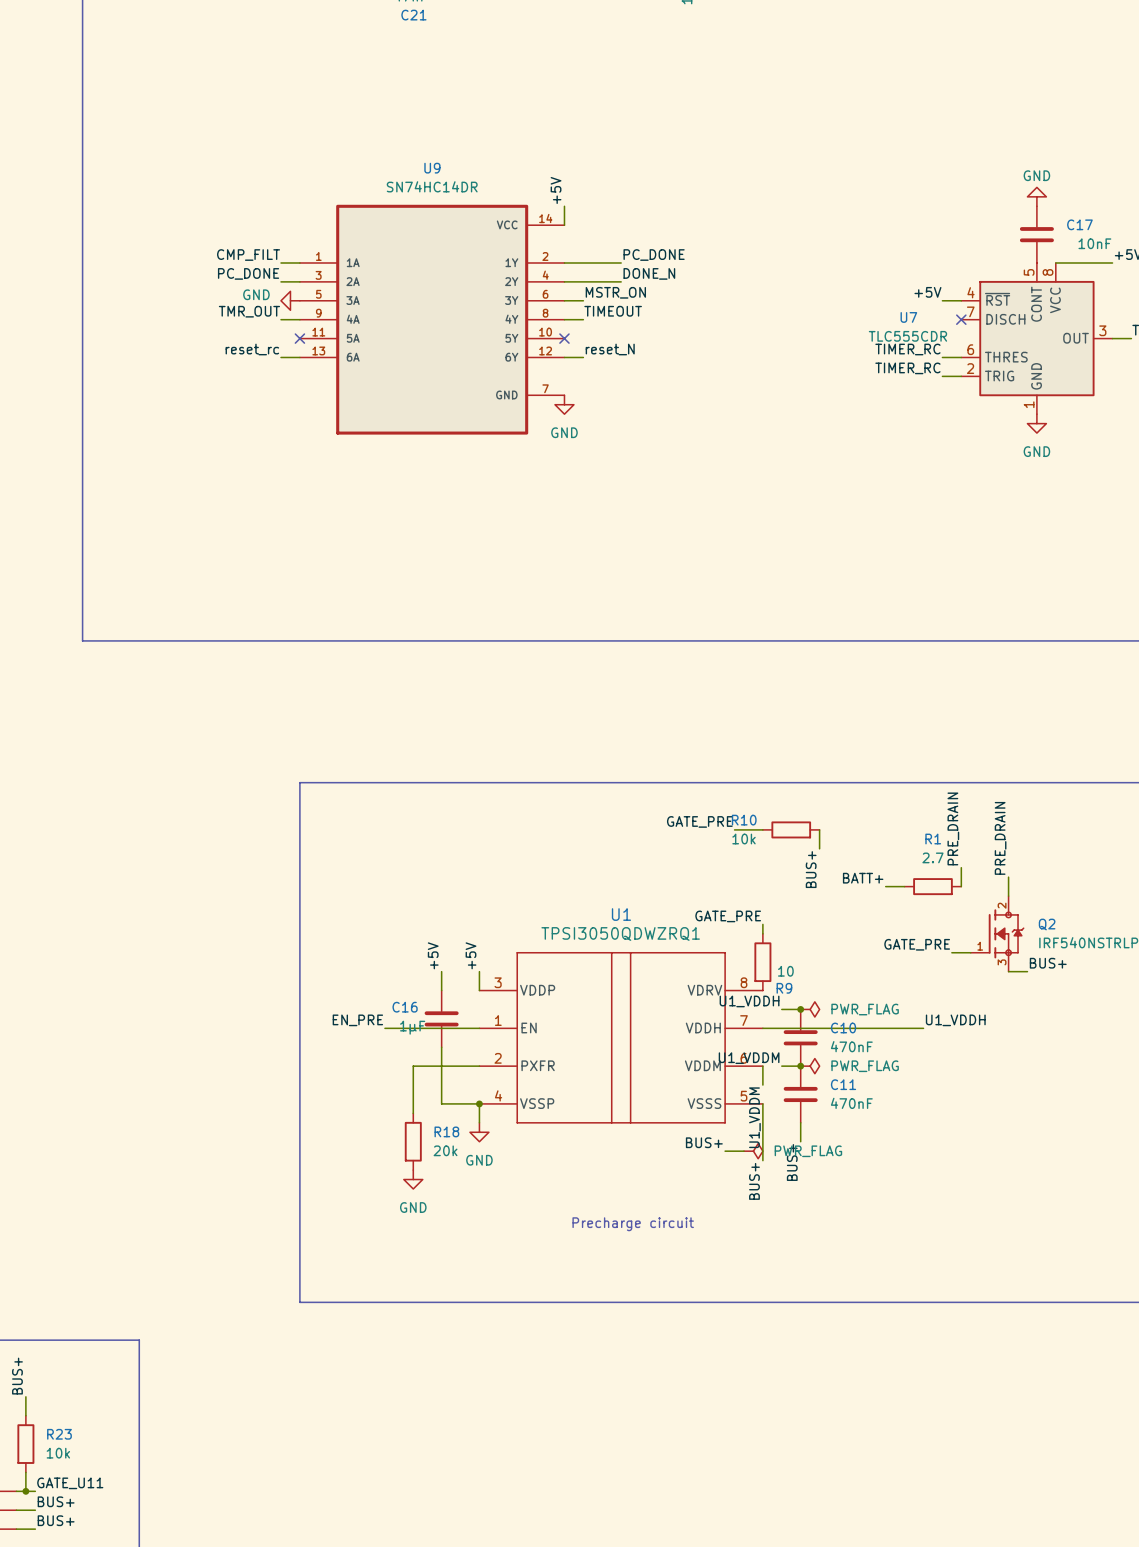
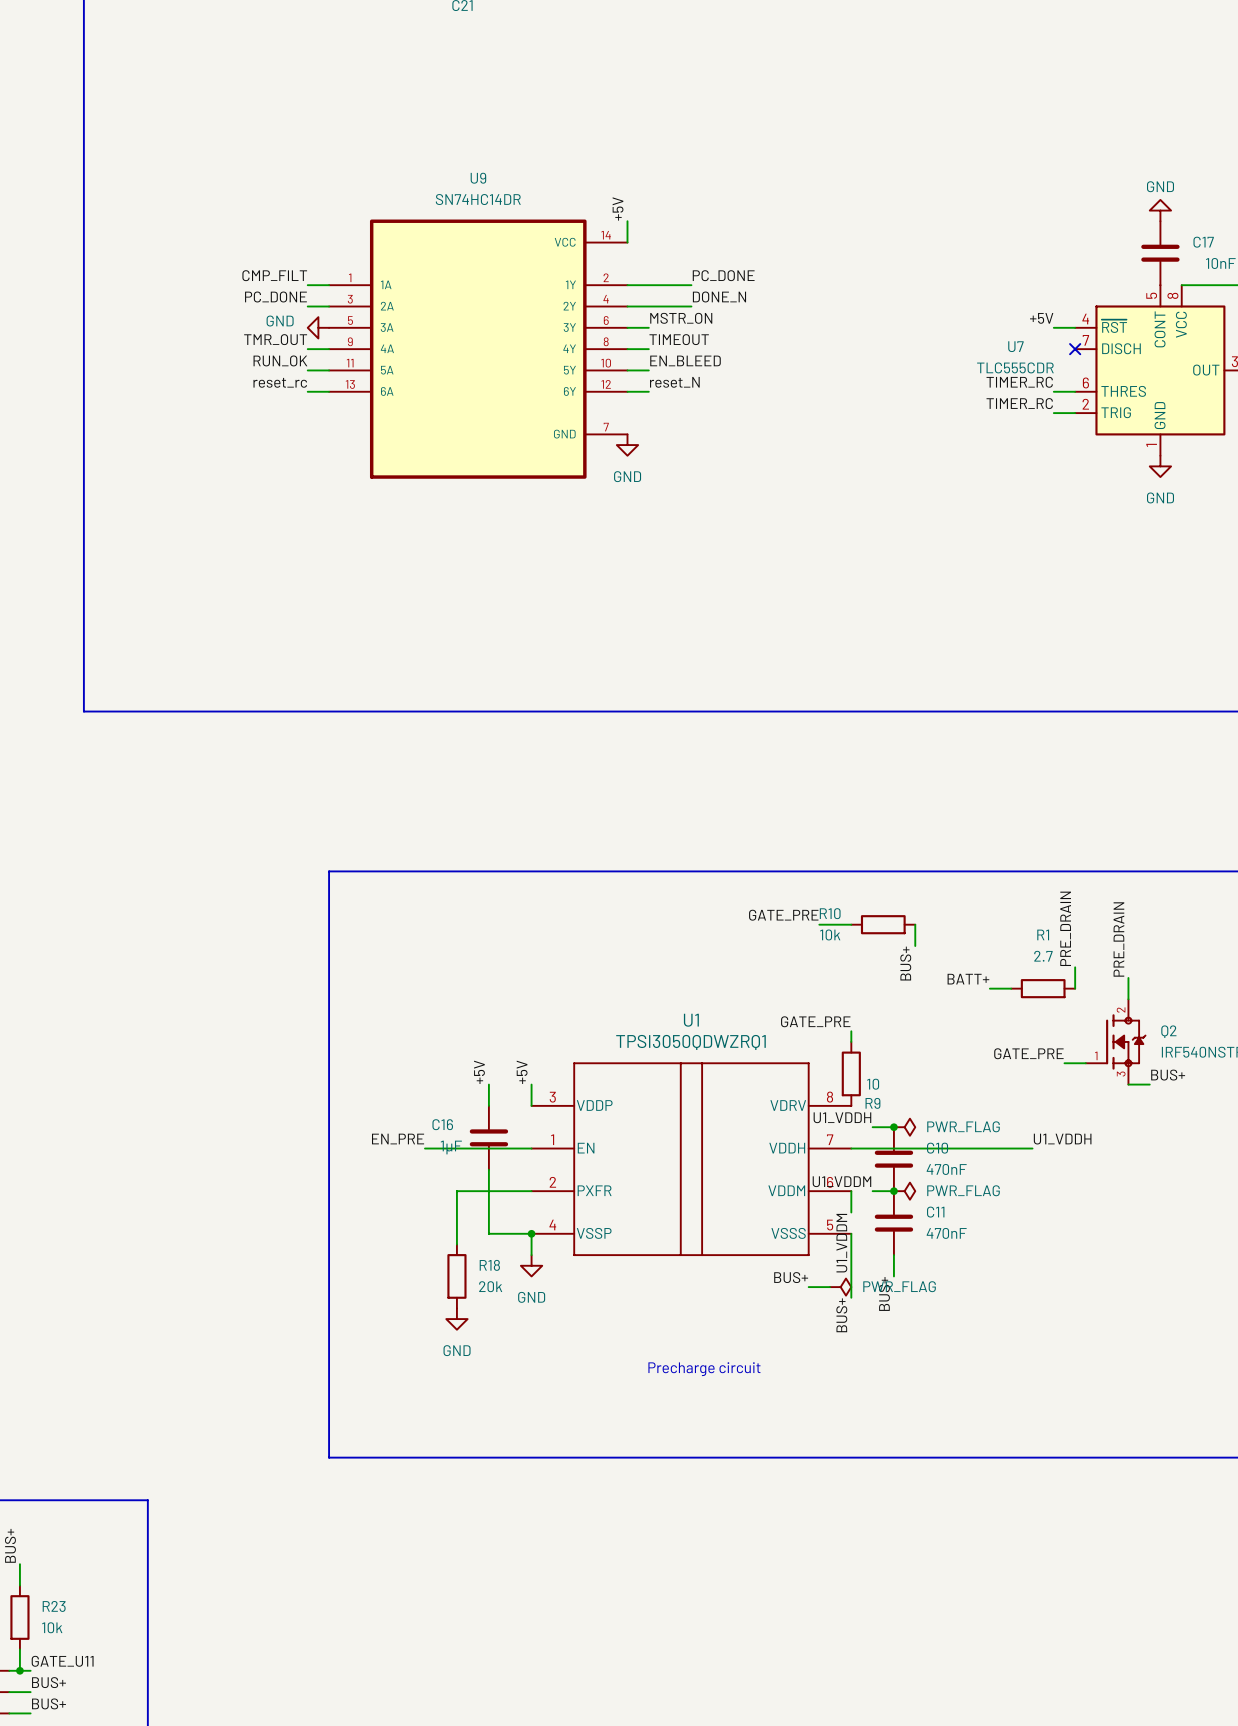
label: none -> RUN_OK (280, 360)
label: none -> EN_BLEED (685, 360)
wire: none -> (307, 370) (329, 370)
no-connect mark: (299, 338) -> none
wire: none -> (627, 370) (648, 370)
no-connect mark: (564, 338) -> none

